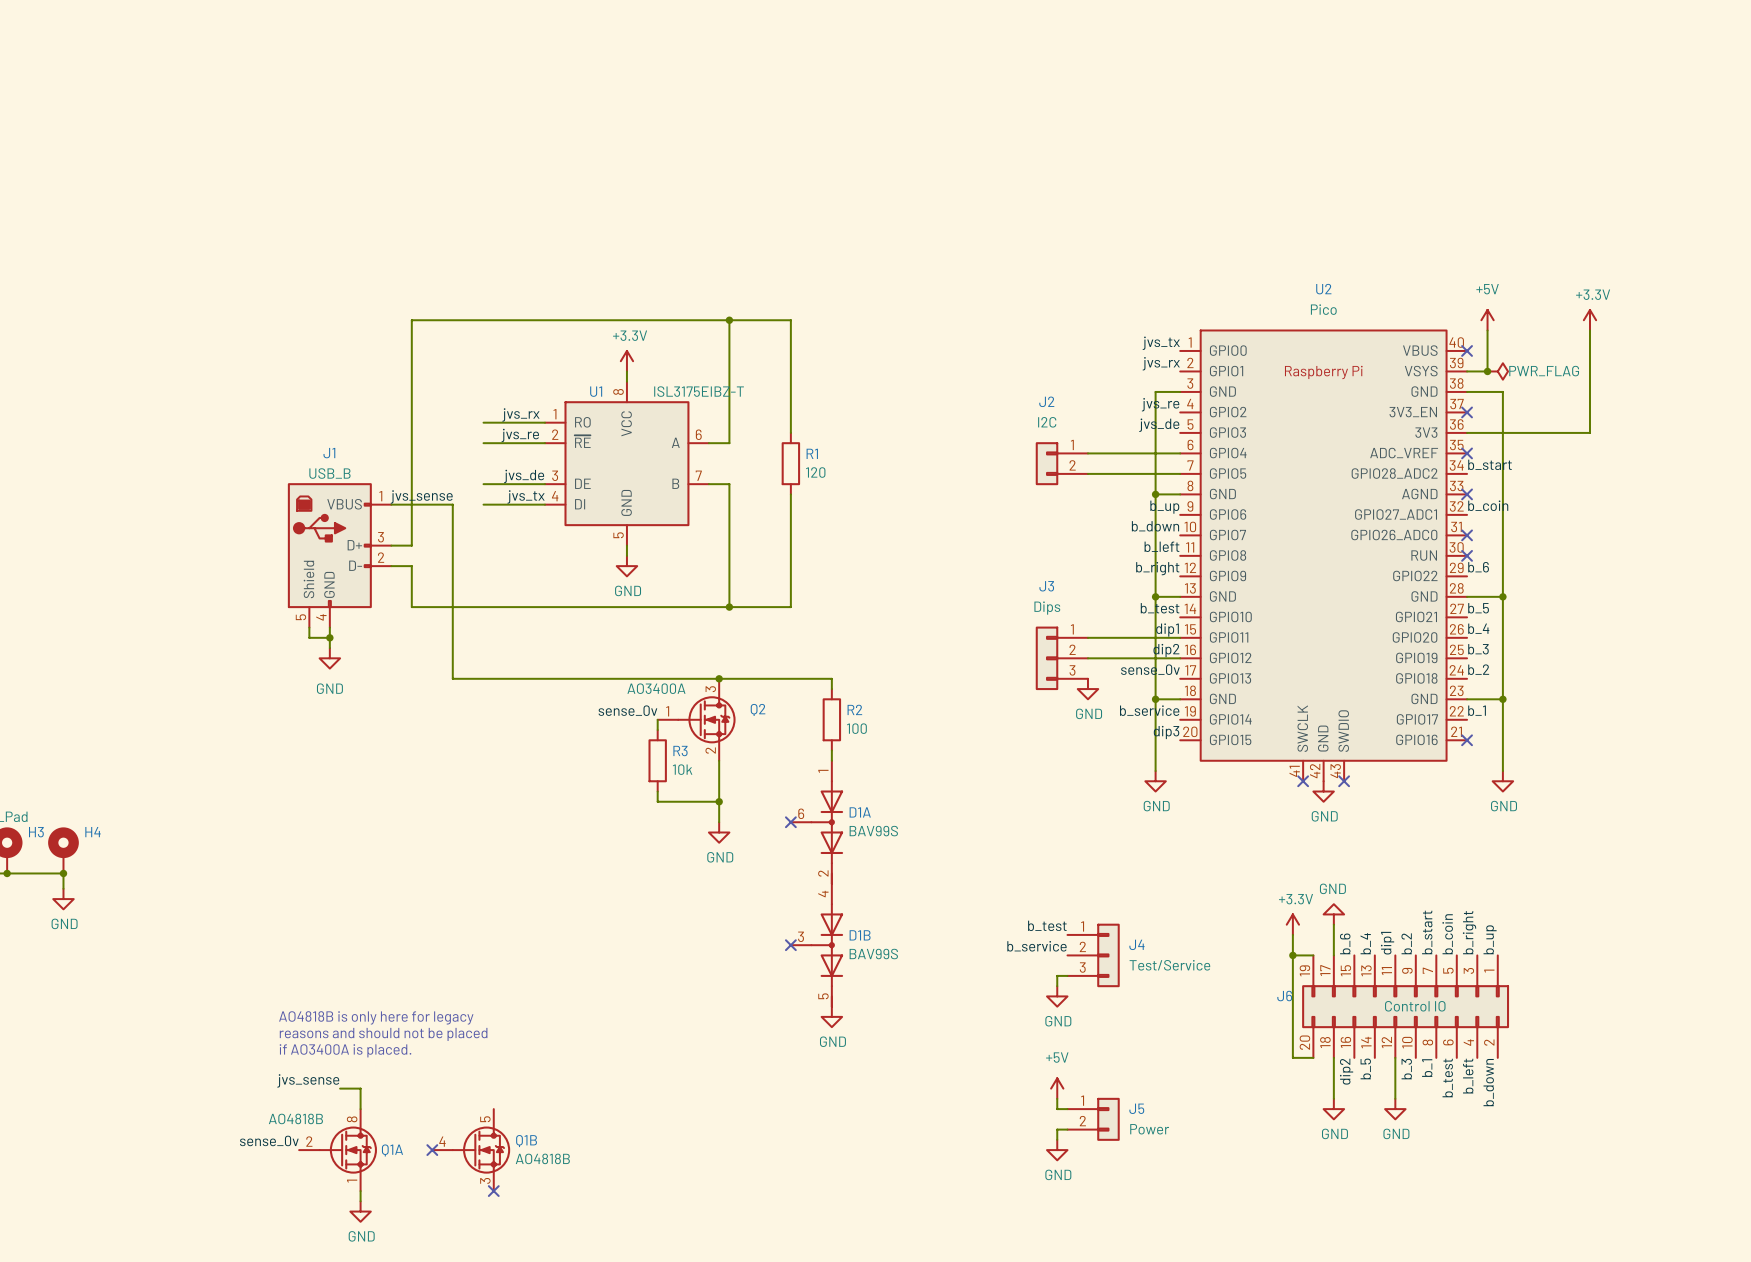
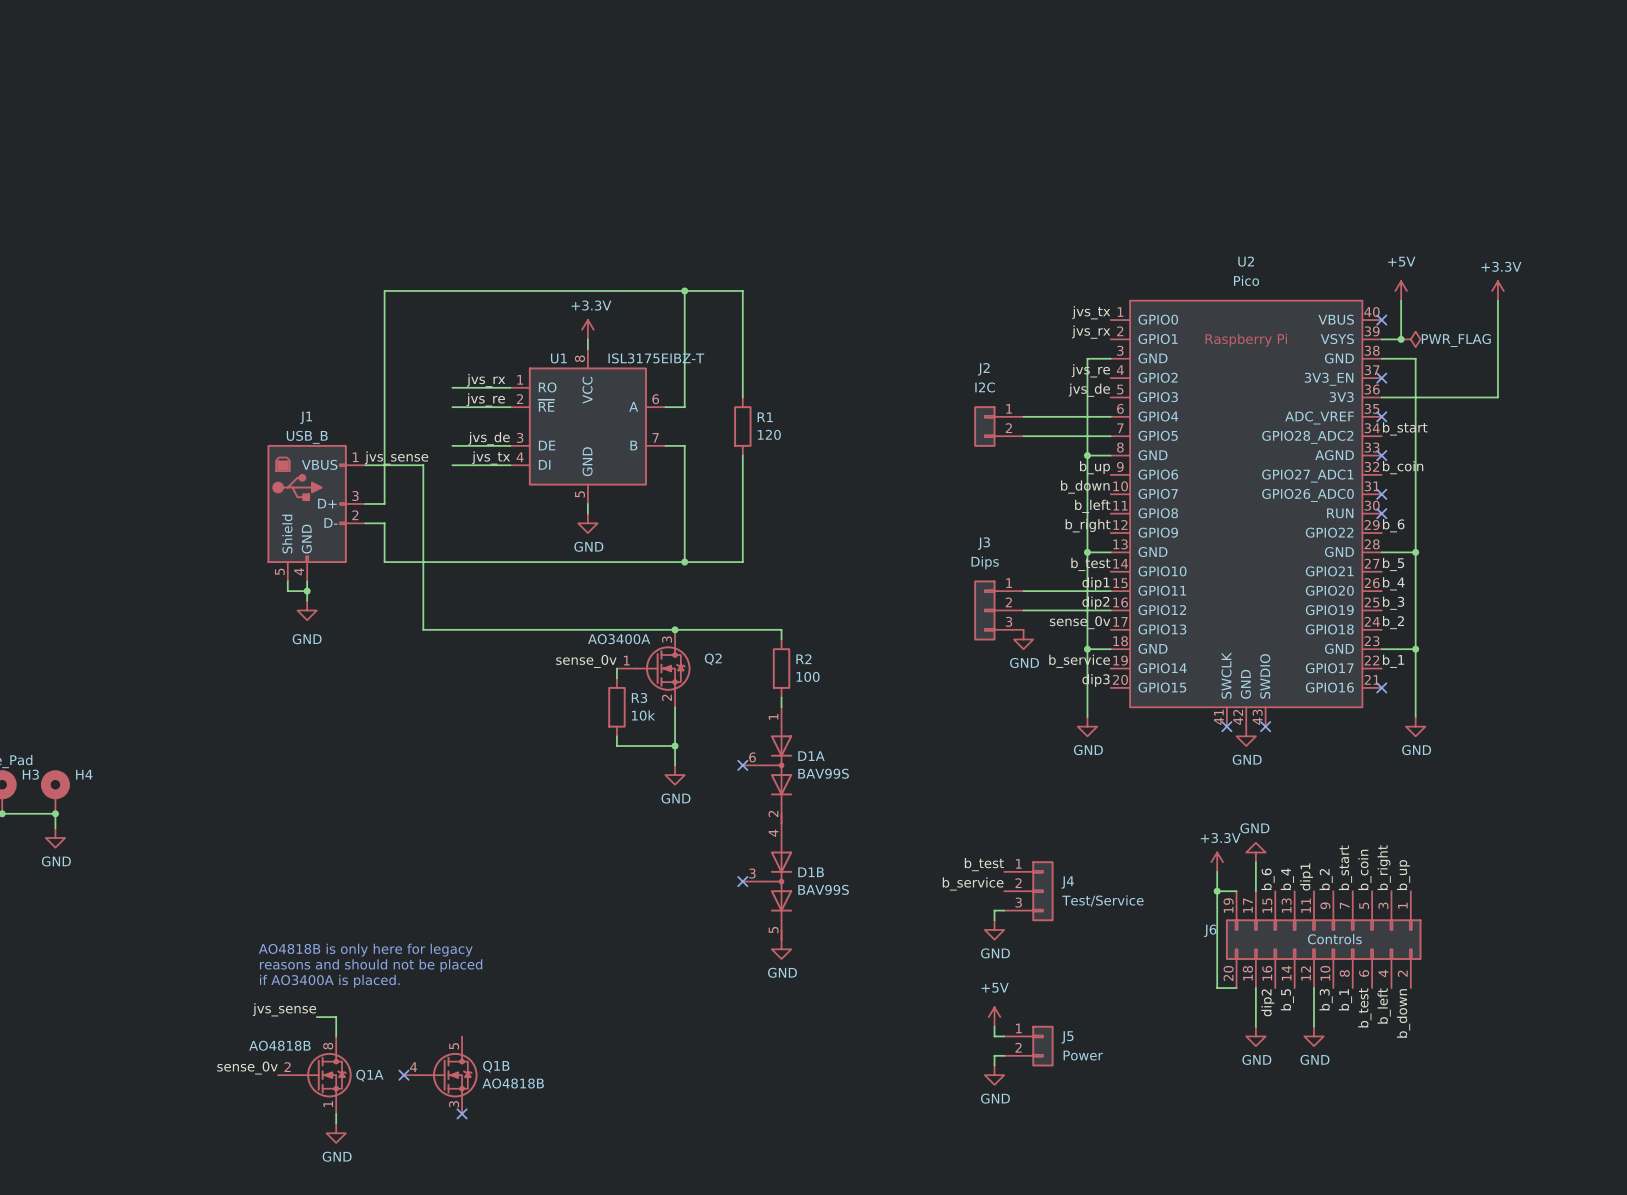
J6 value: Control IO (1415, 1006) -> Controls (1334, 939)

